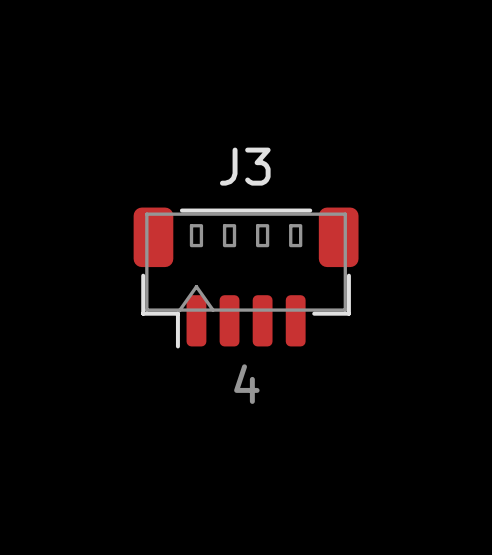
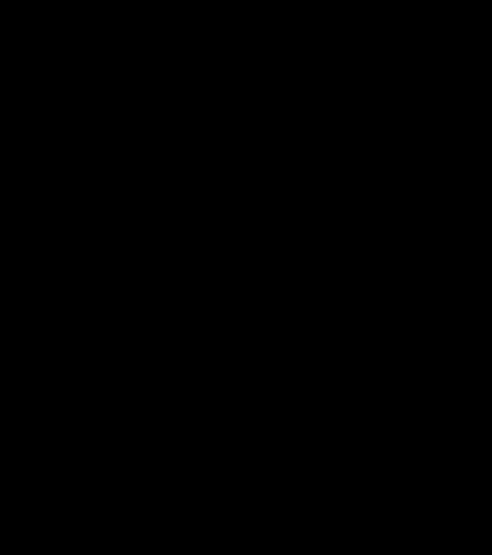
J3: 4 (246, 277) -> none

